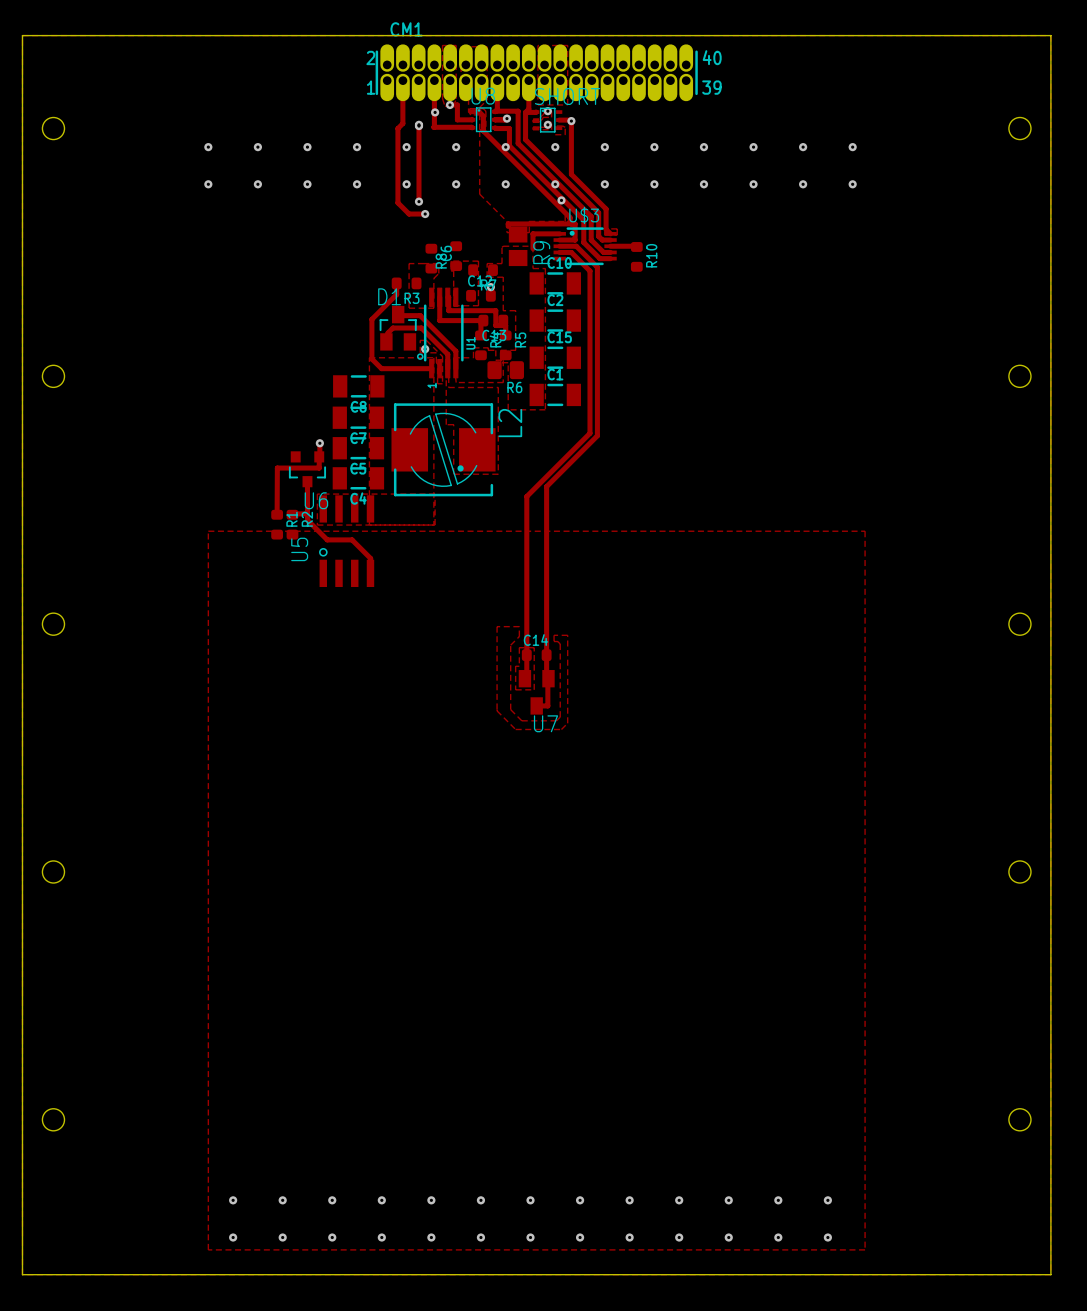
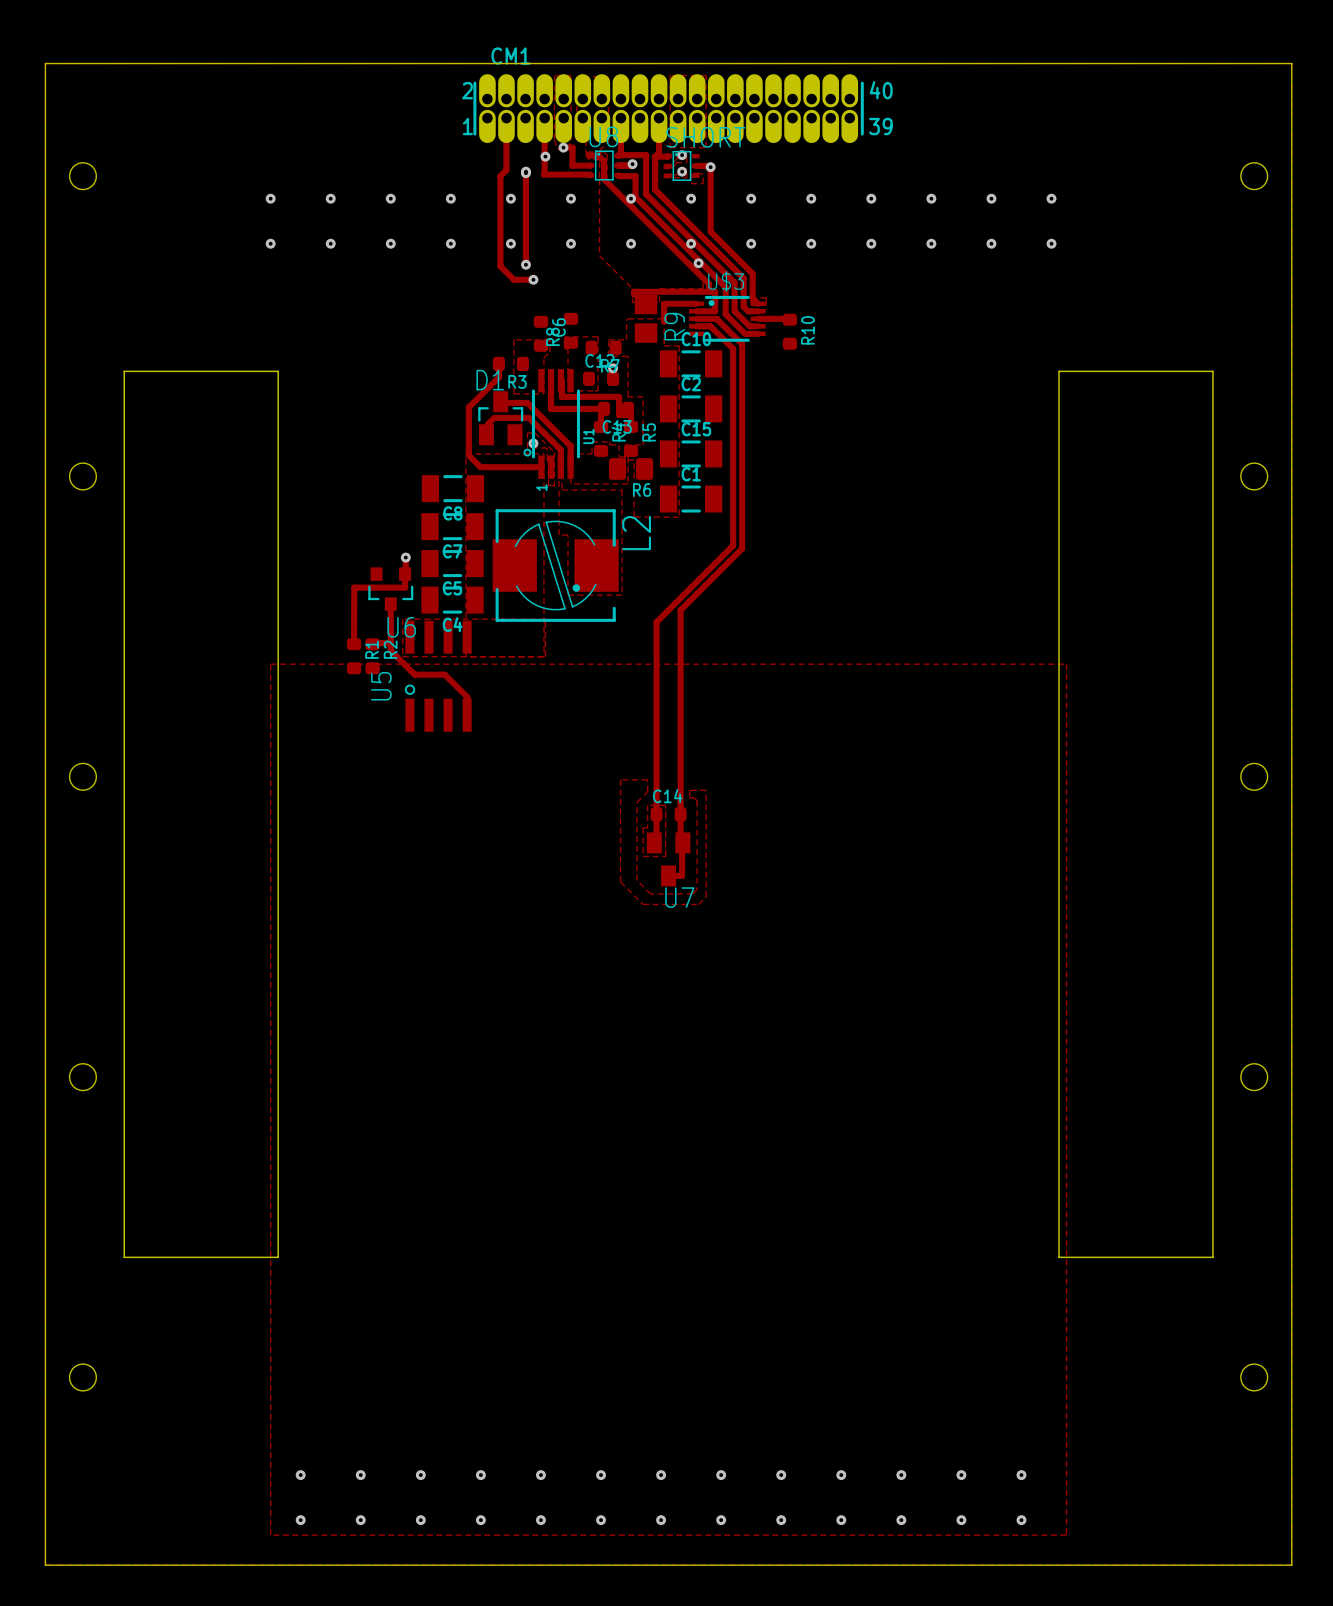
board edge: none -> (124, 371) (124, 1257) (278, 1257) (278, 371) (124, 371)
board edge: none -> (1059, 371) (1212, 371) (1212, 1257) (1059, 1257) (1059, 371)

